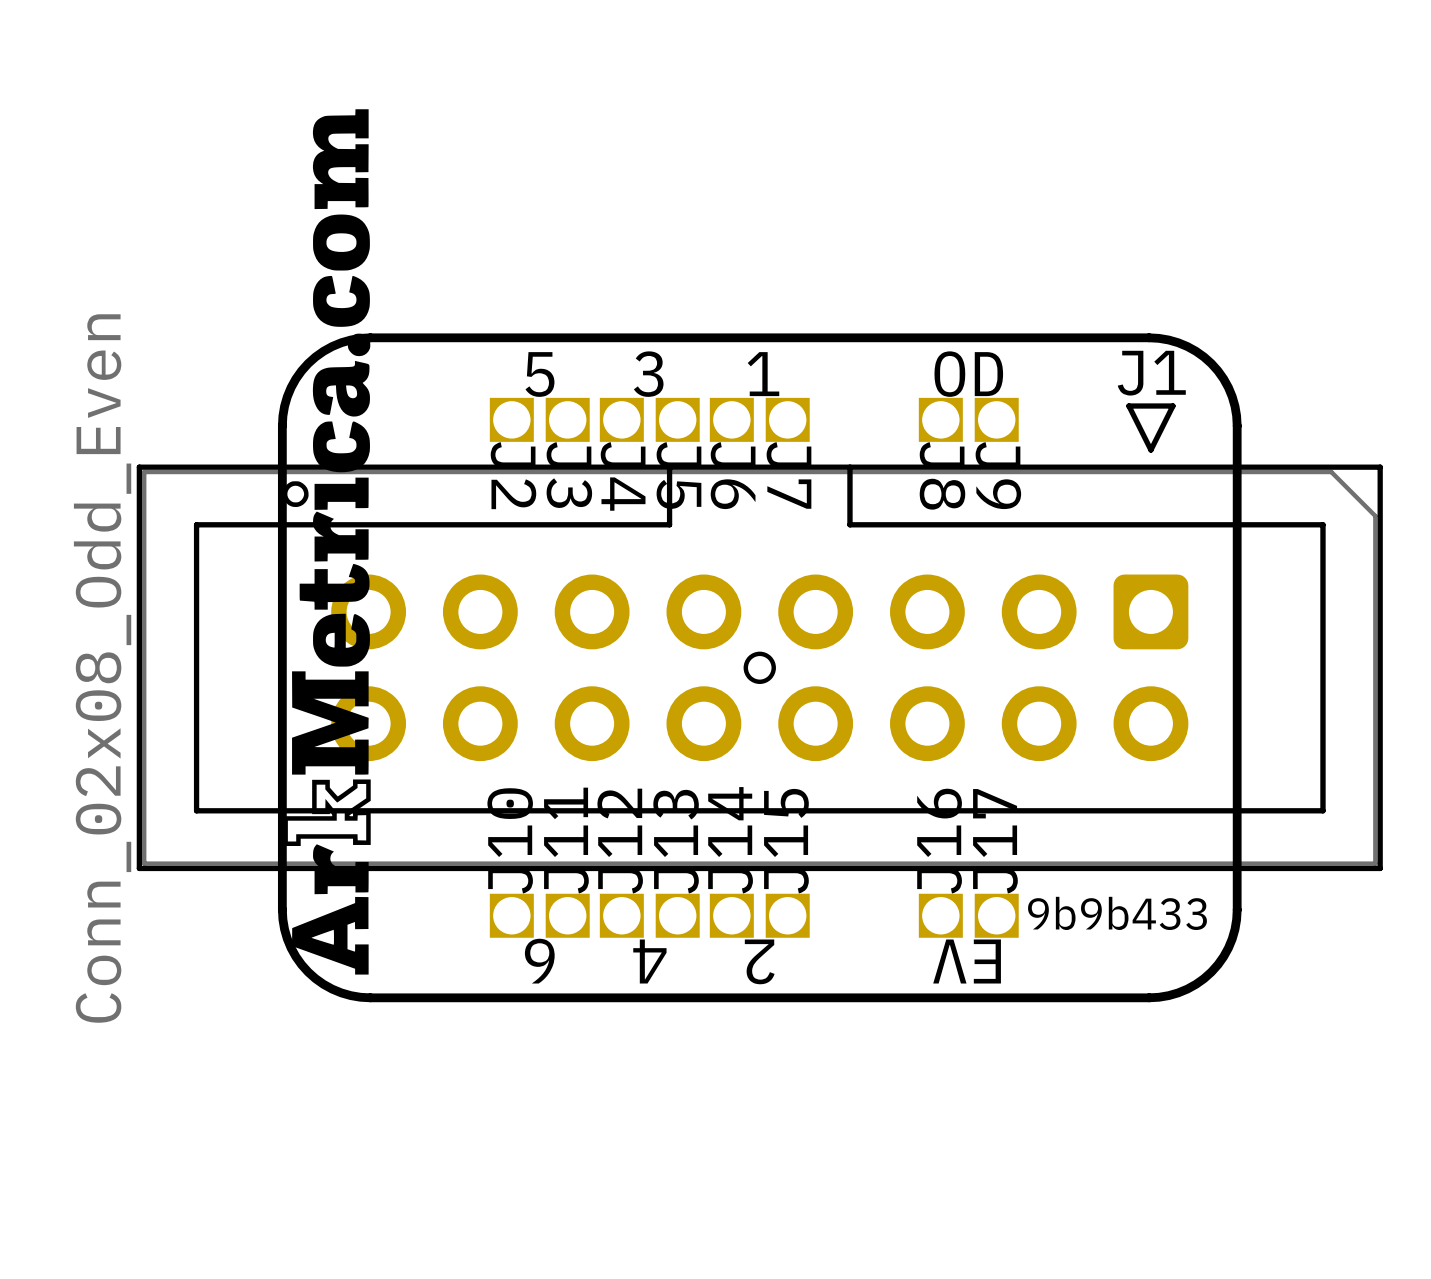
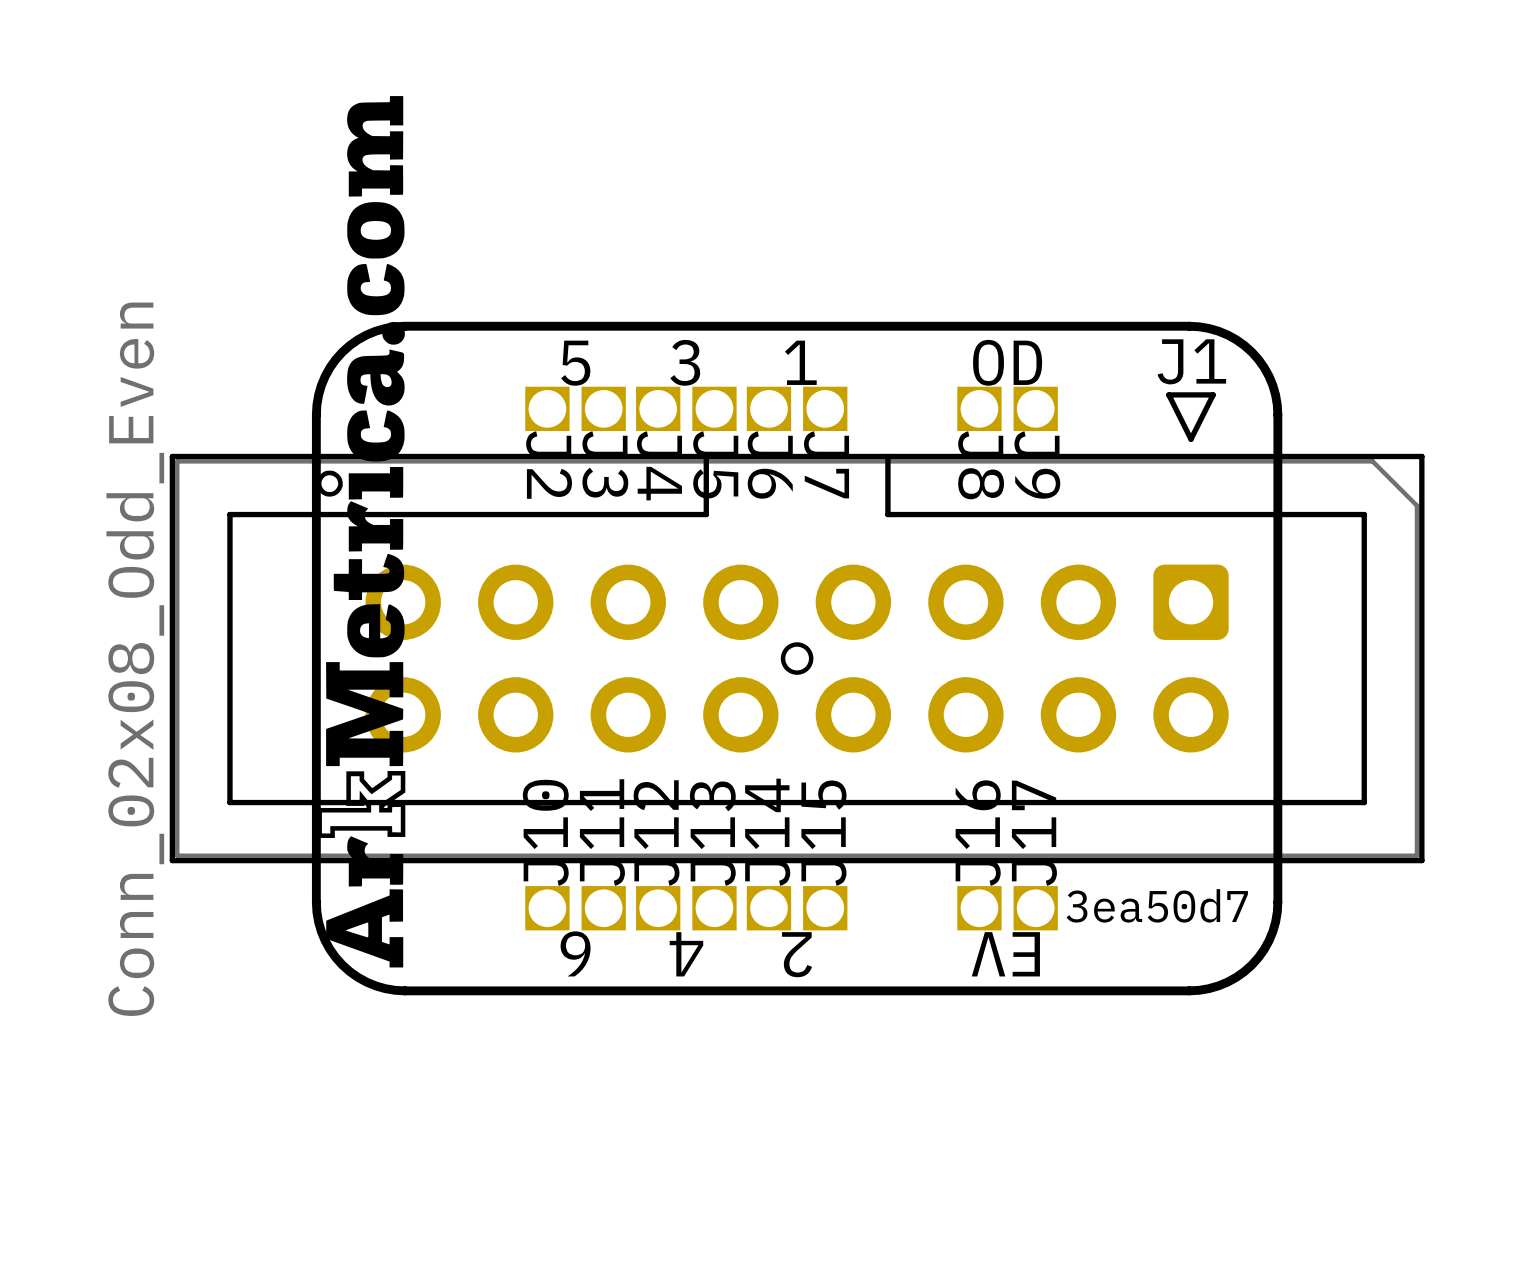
text: 9b9b433 (1117, 913) -> 3ea50d7 (1157, 905)

